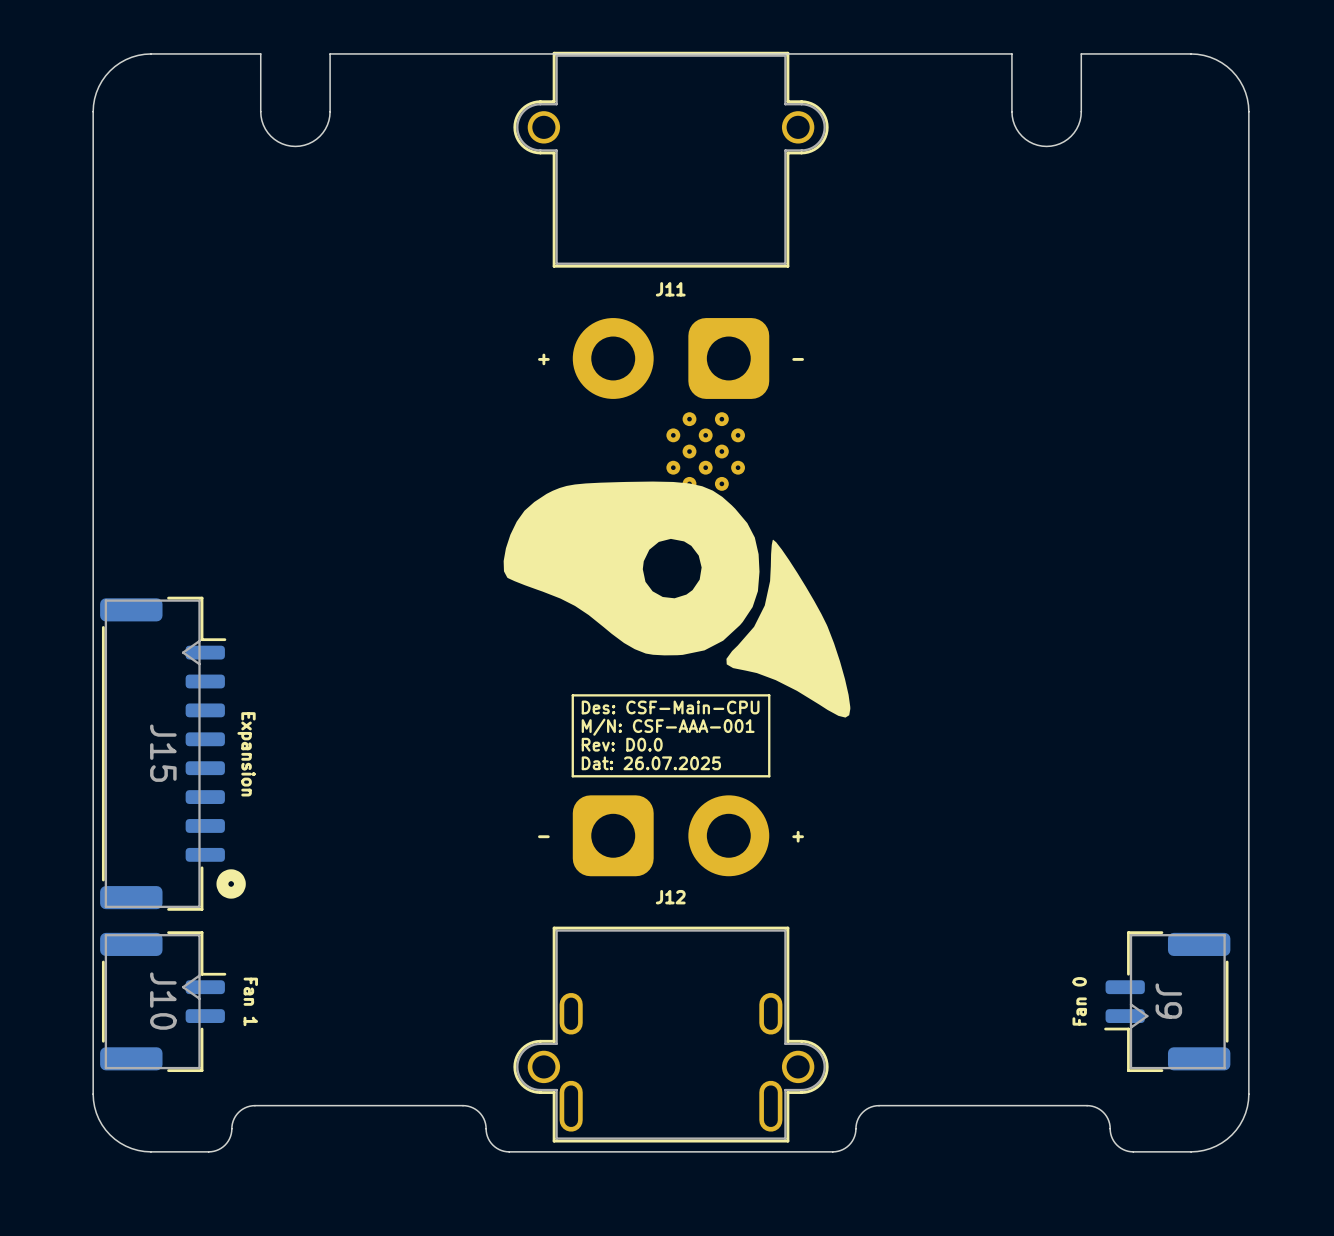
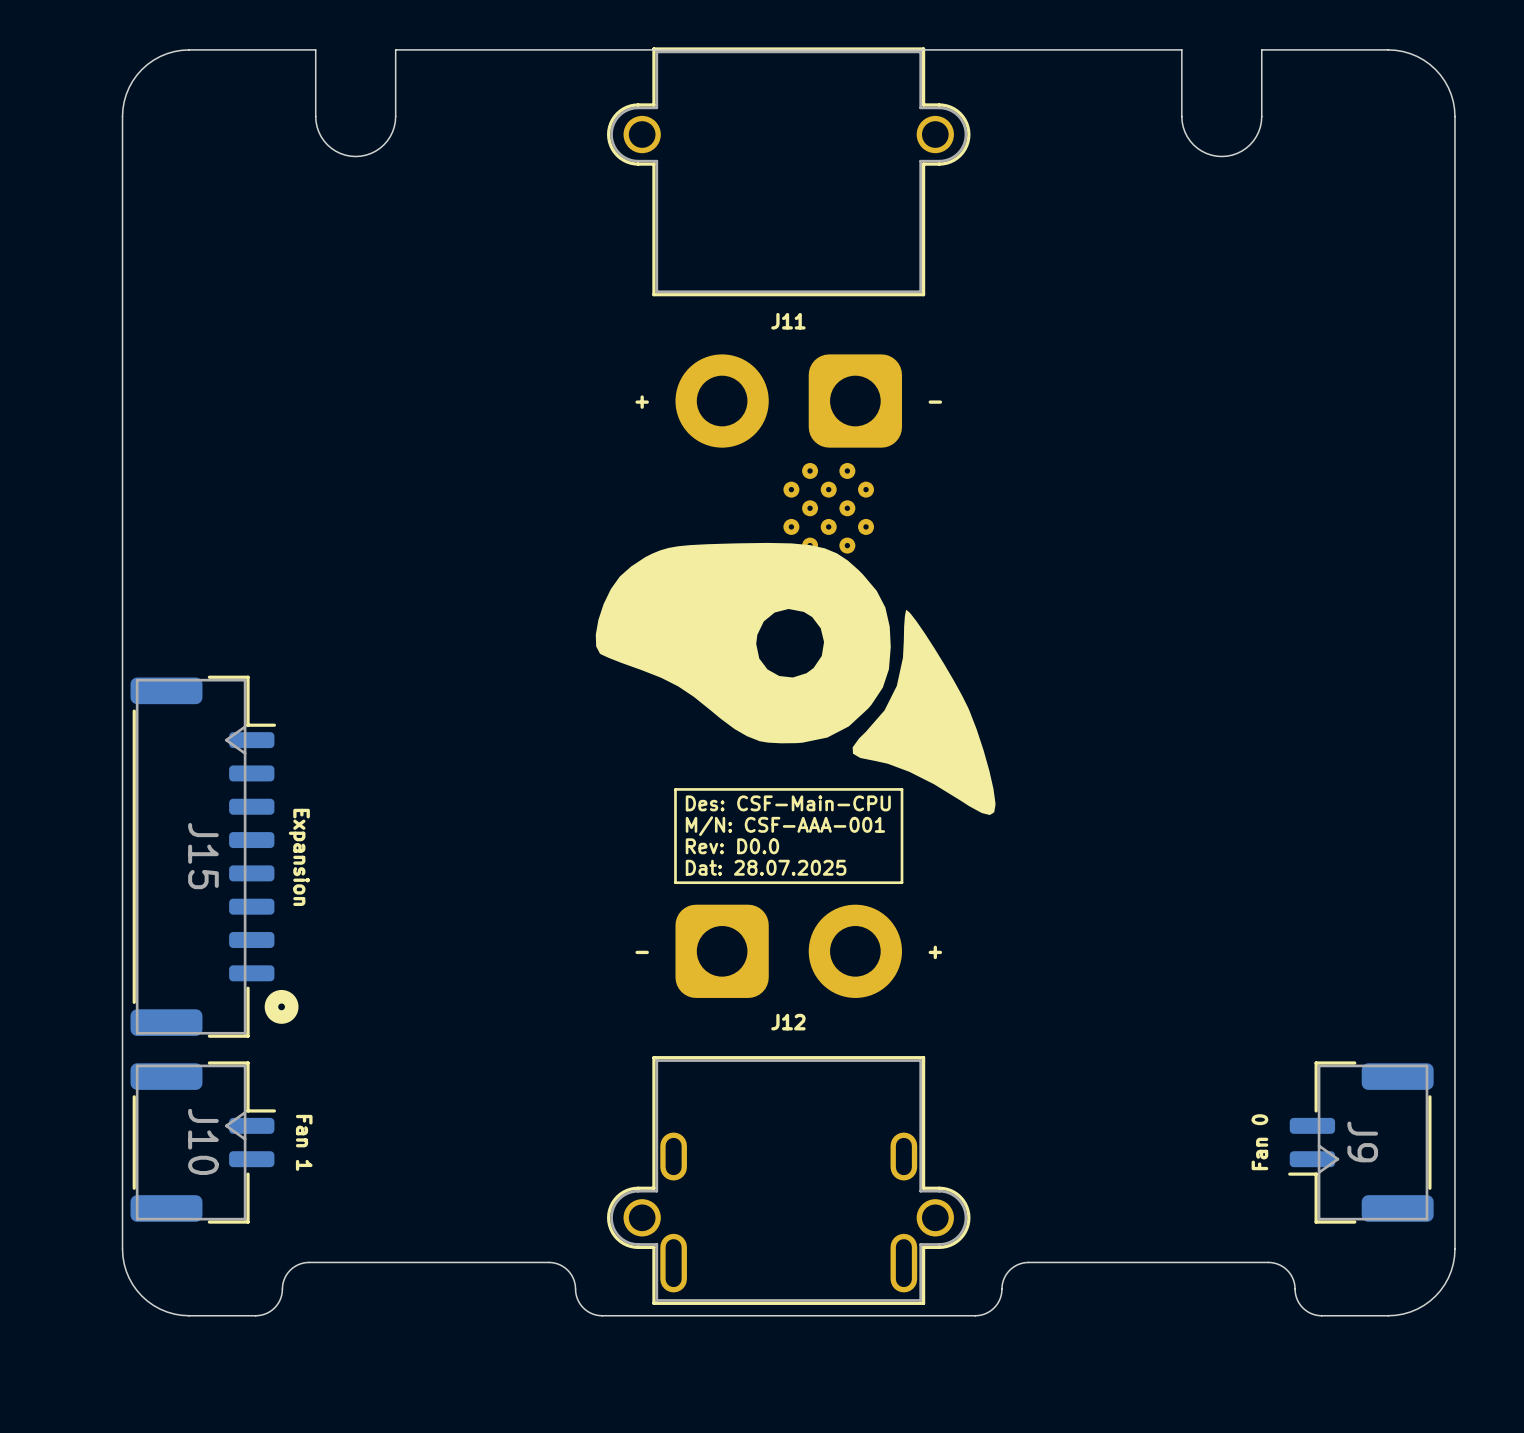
text: Dat: 26.07.2025 (651, 763) -> Dat: 28.07.2025 (766, 867)

